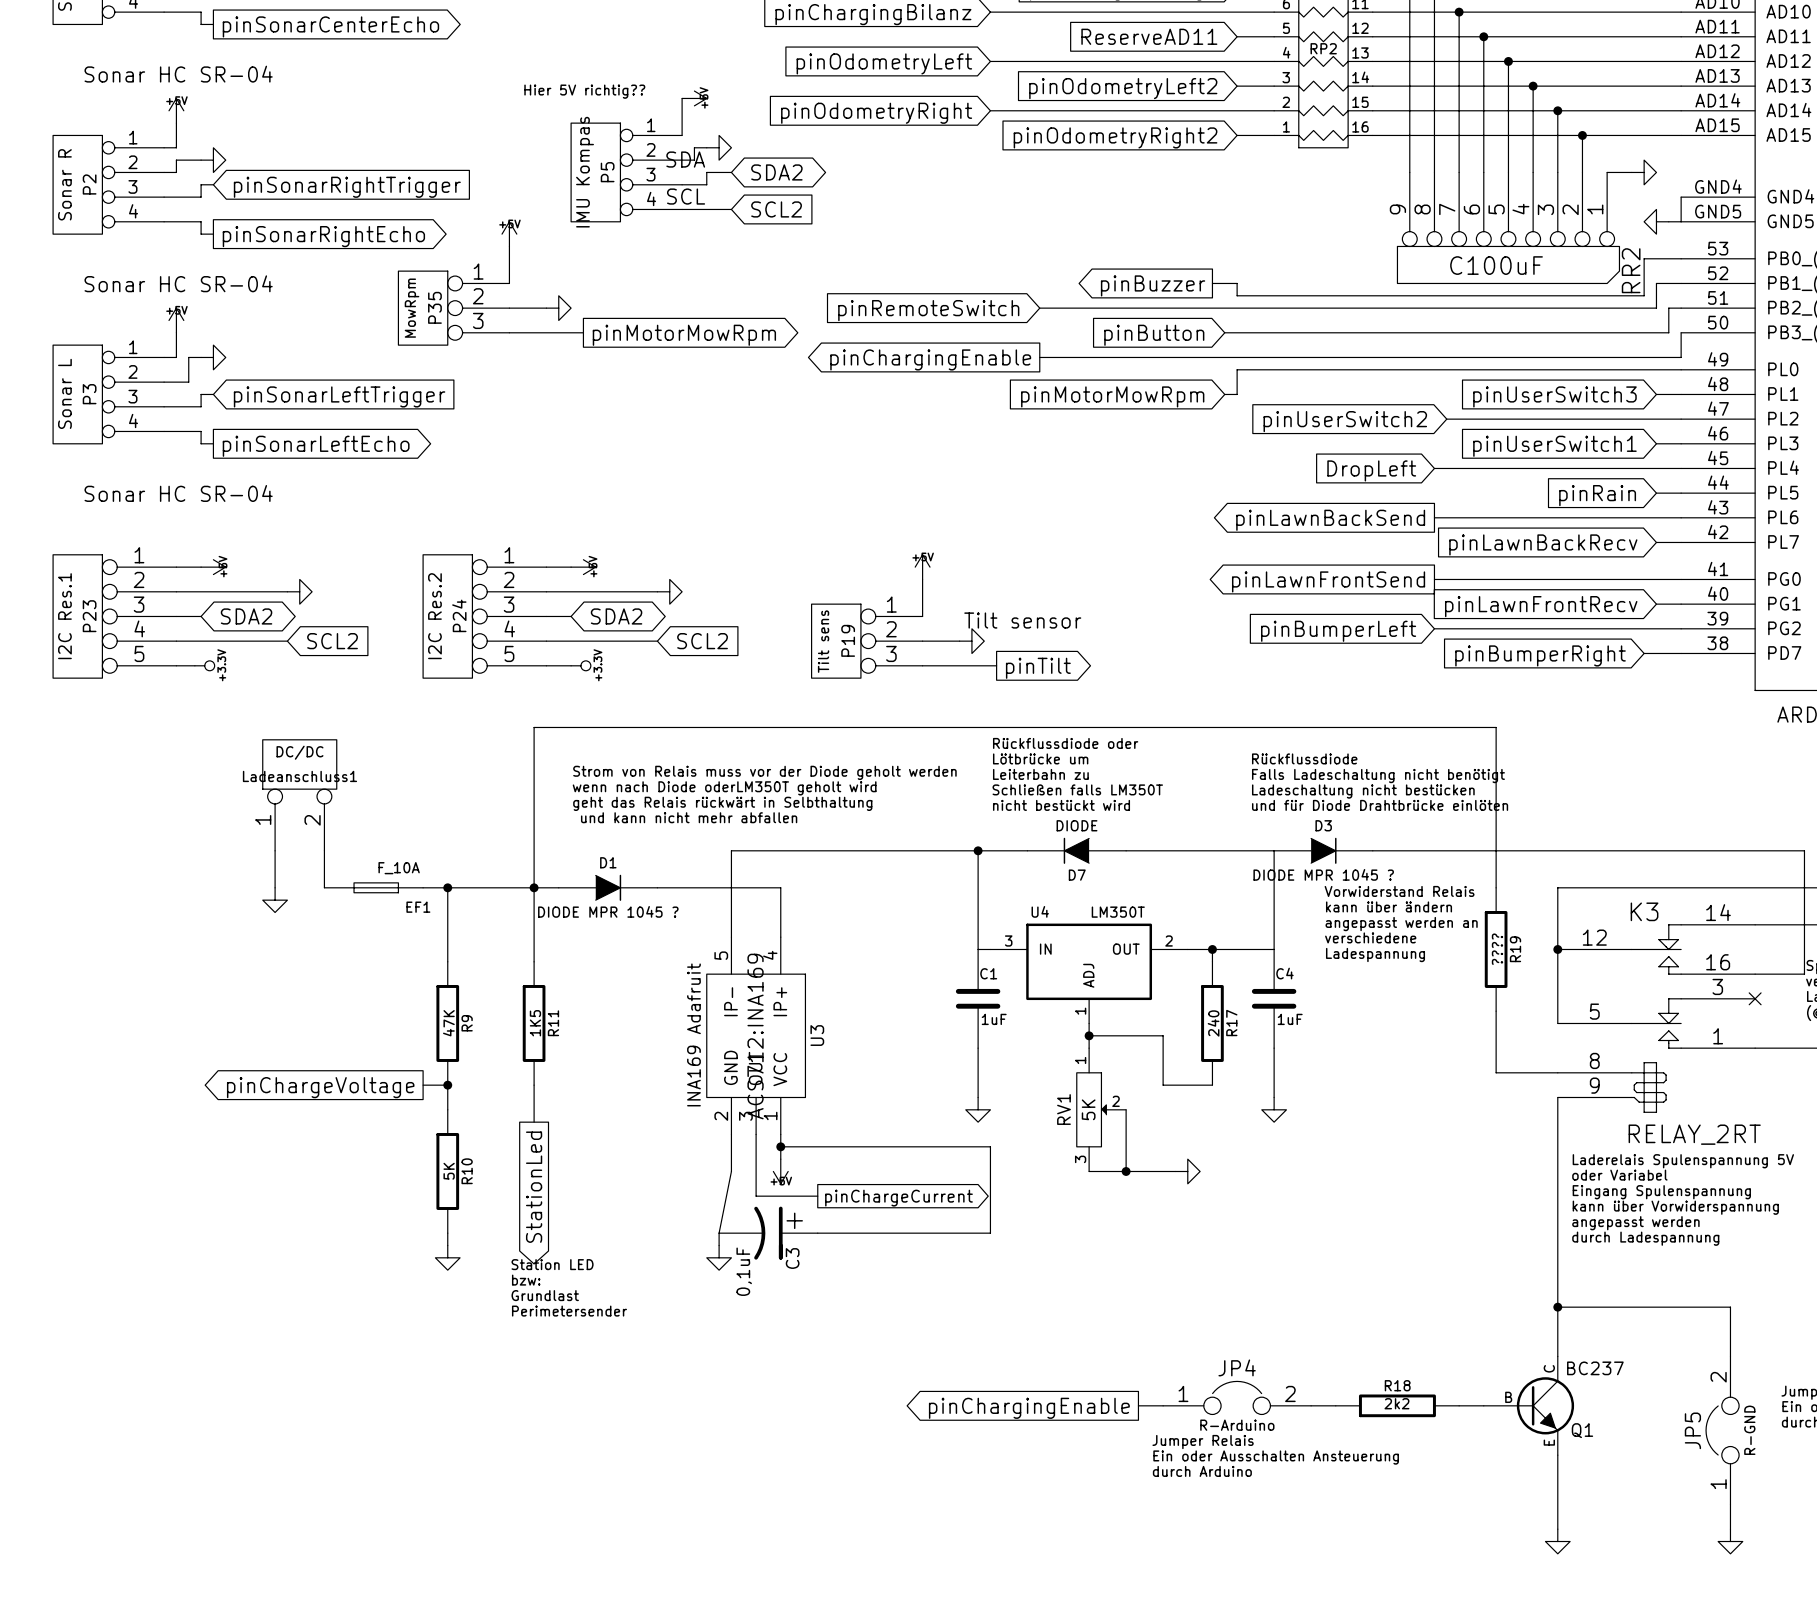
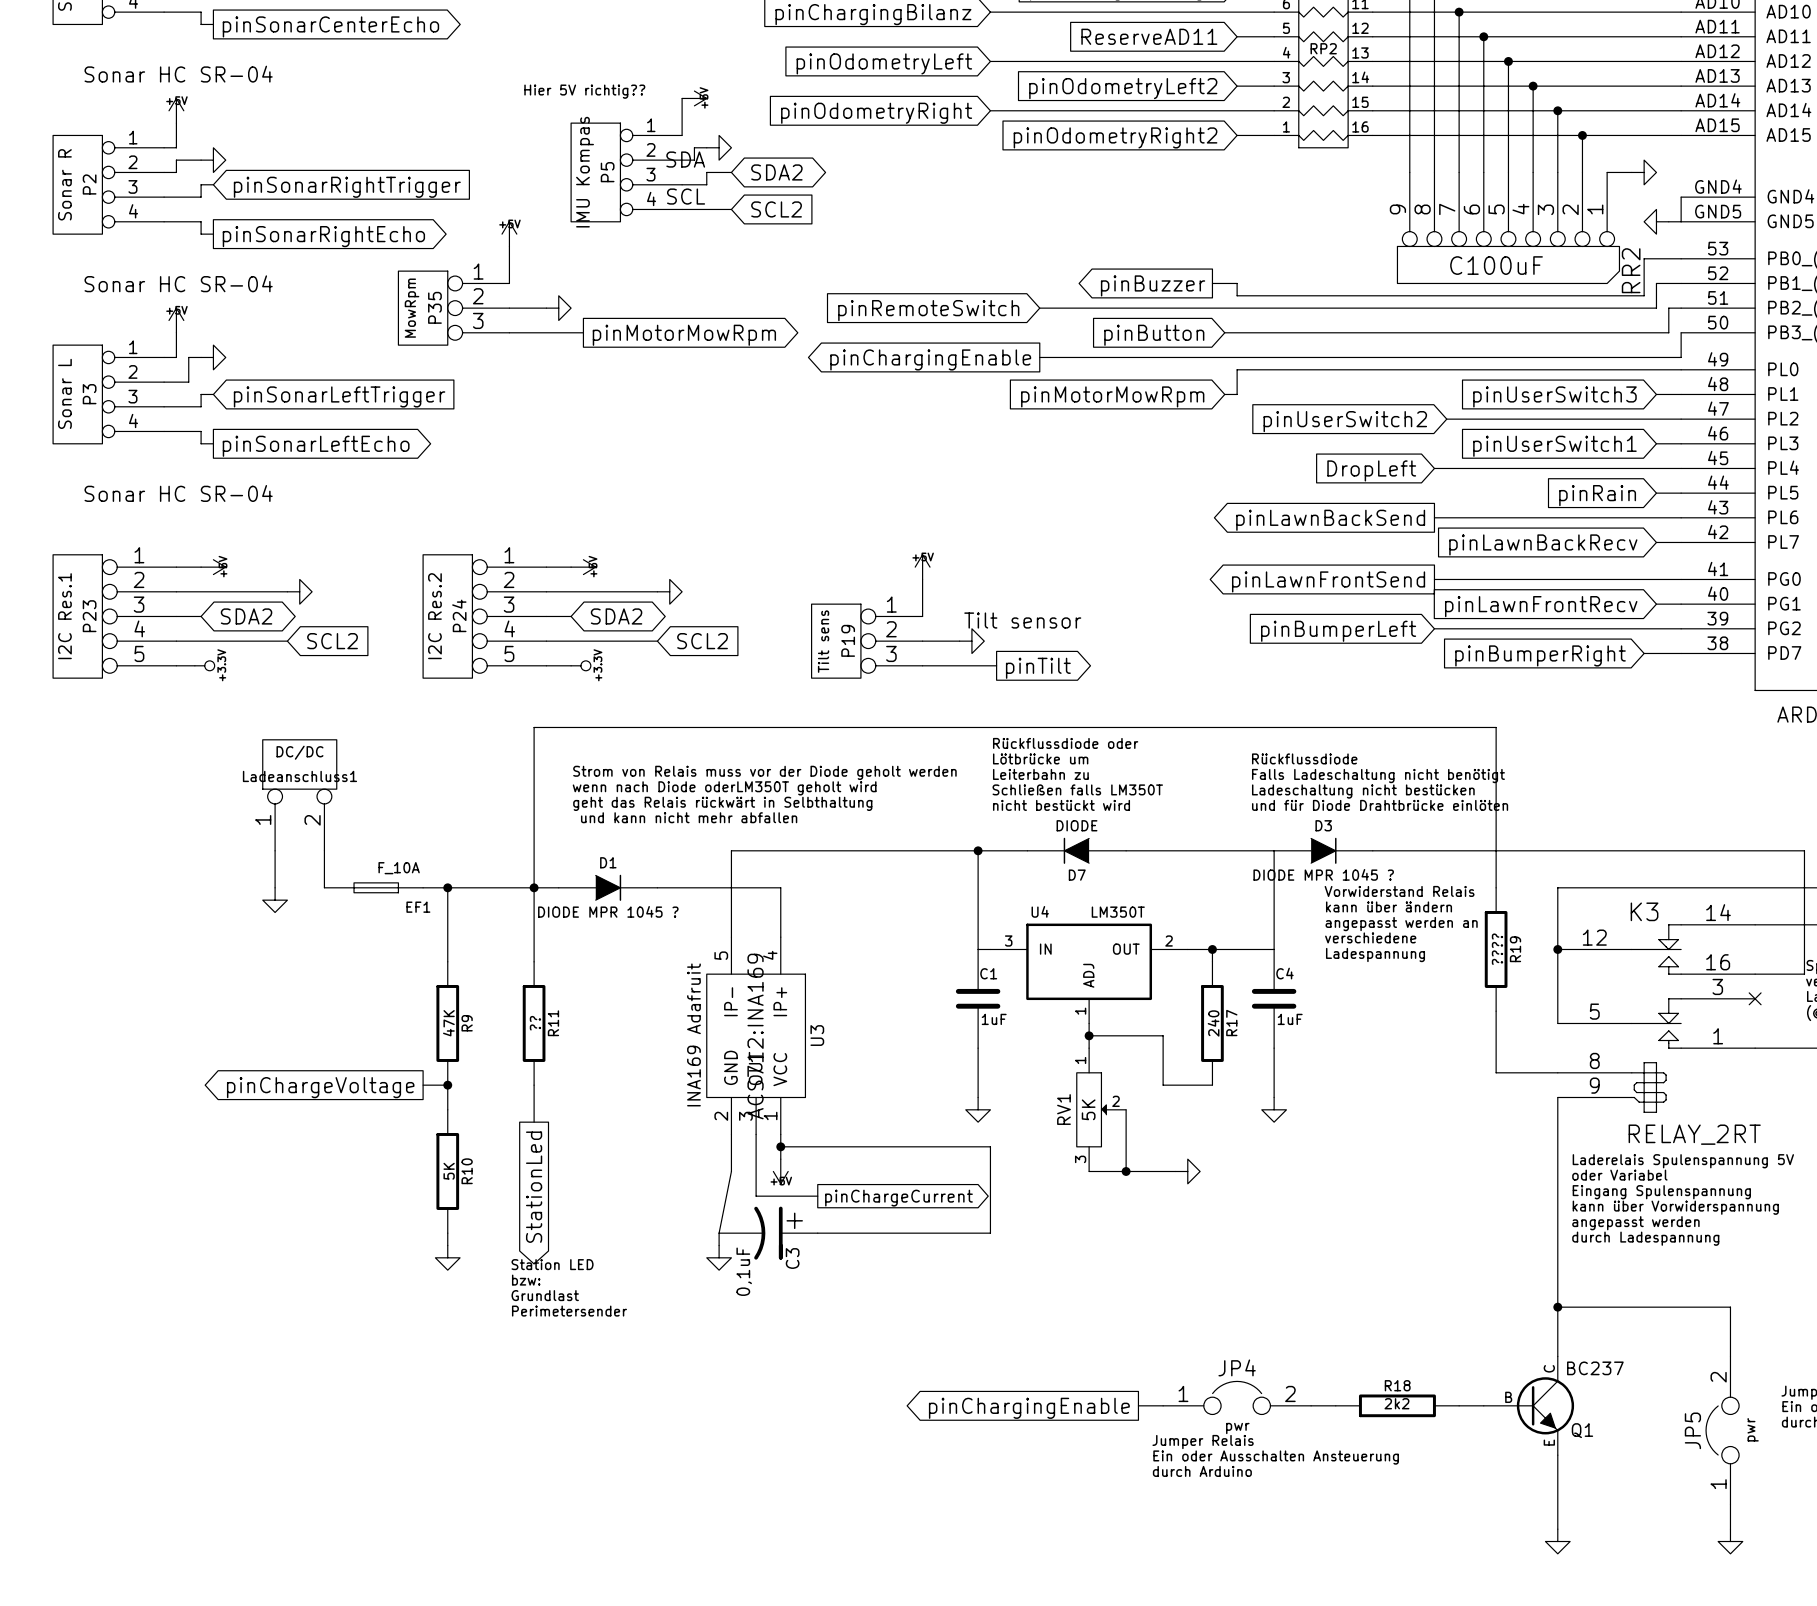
R11 value: 1K5 (535, 1023) -> ?? (535, 1023)
JP4 value: R-Arduino (1237, 1425) -> pwr (1237, 1428)
JP5 value: R-GND (1749, 1430) -> pwr (1753, 1429)

